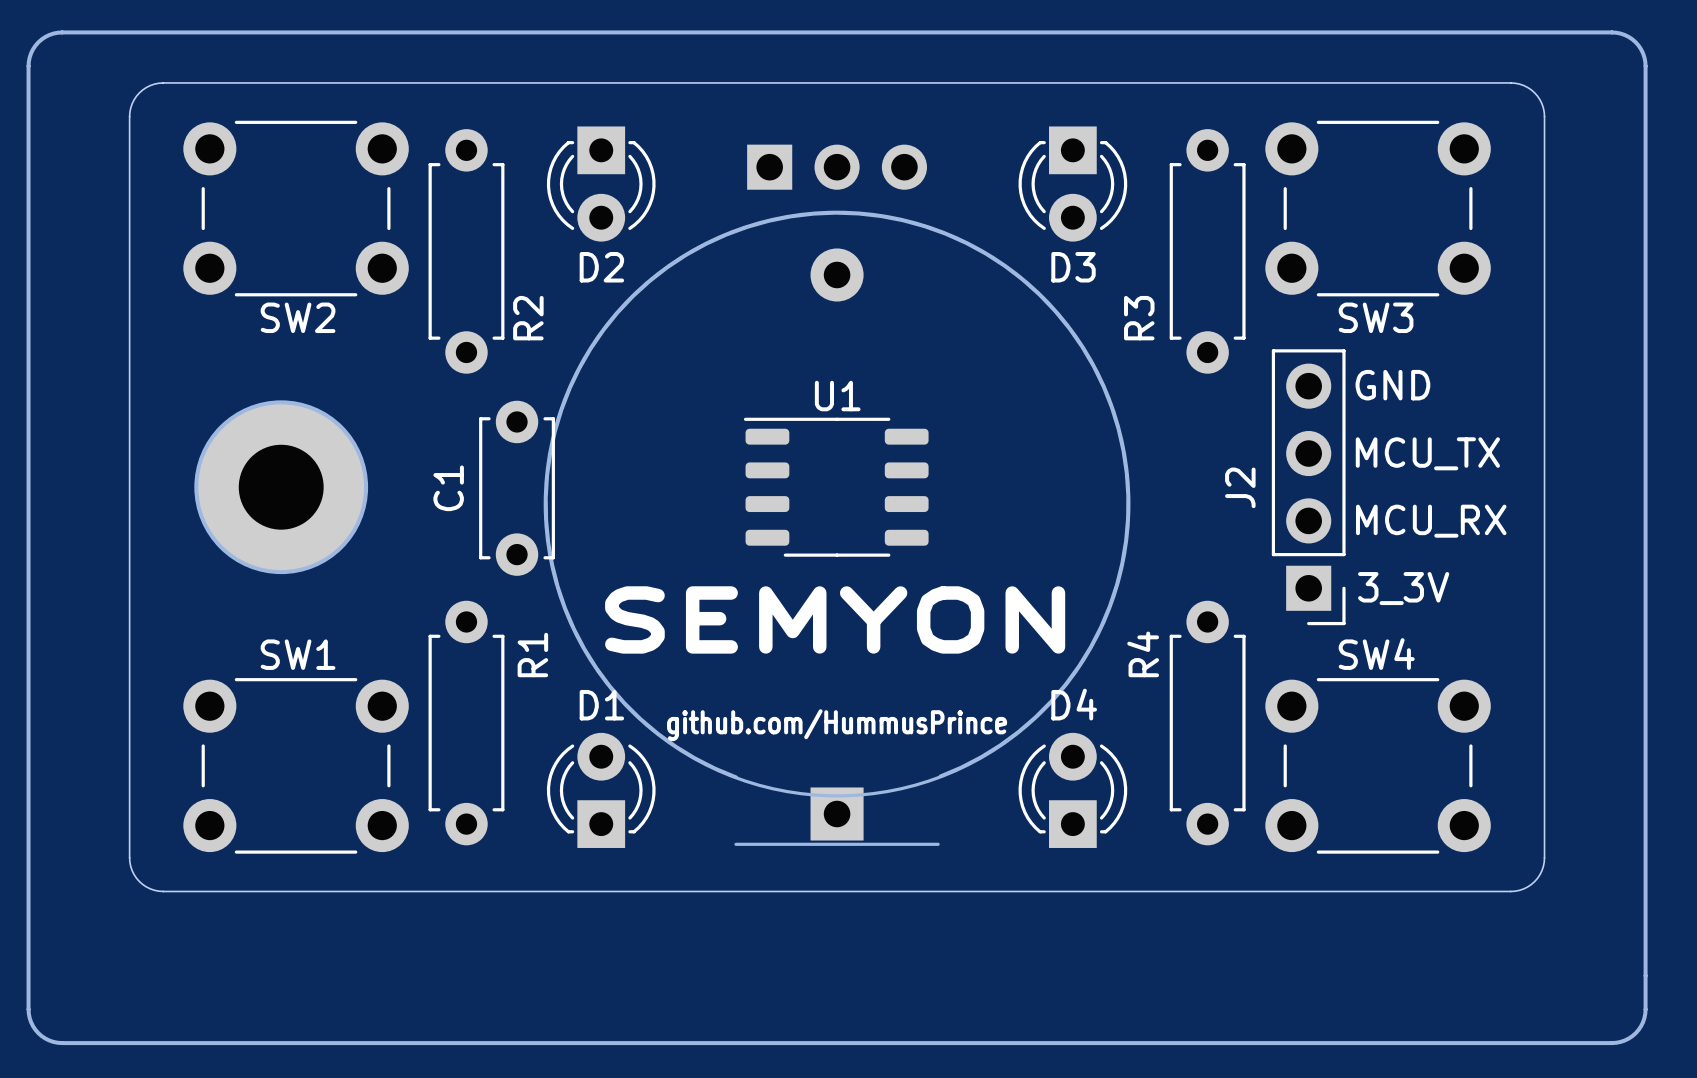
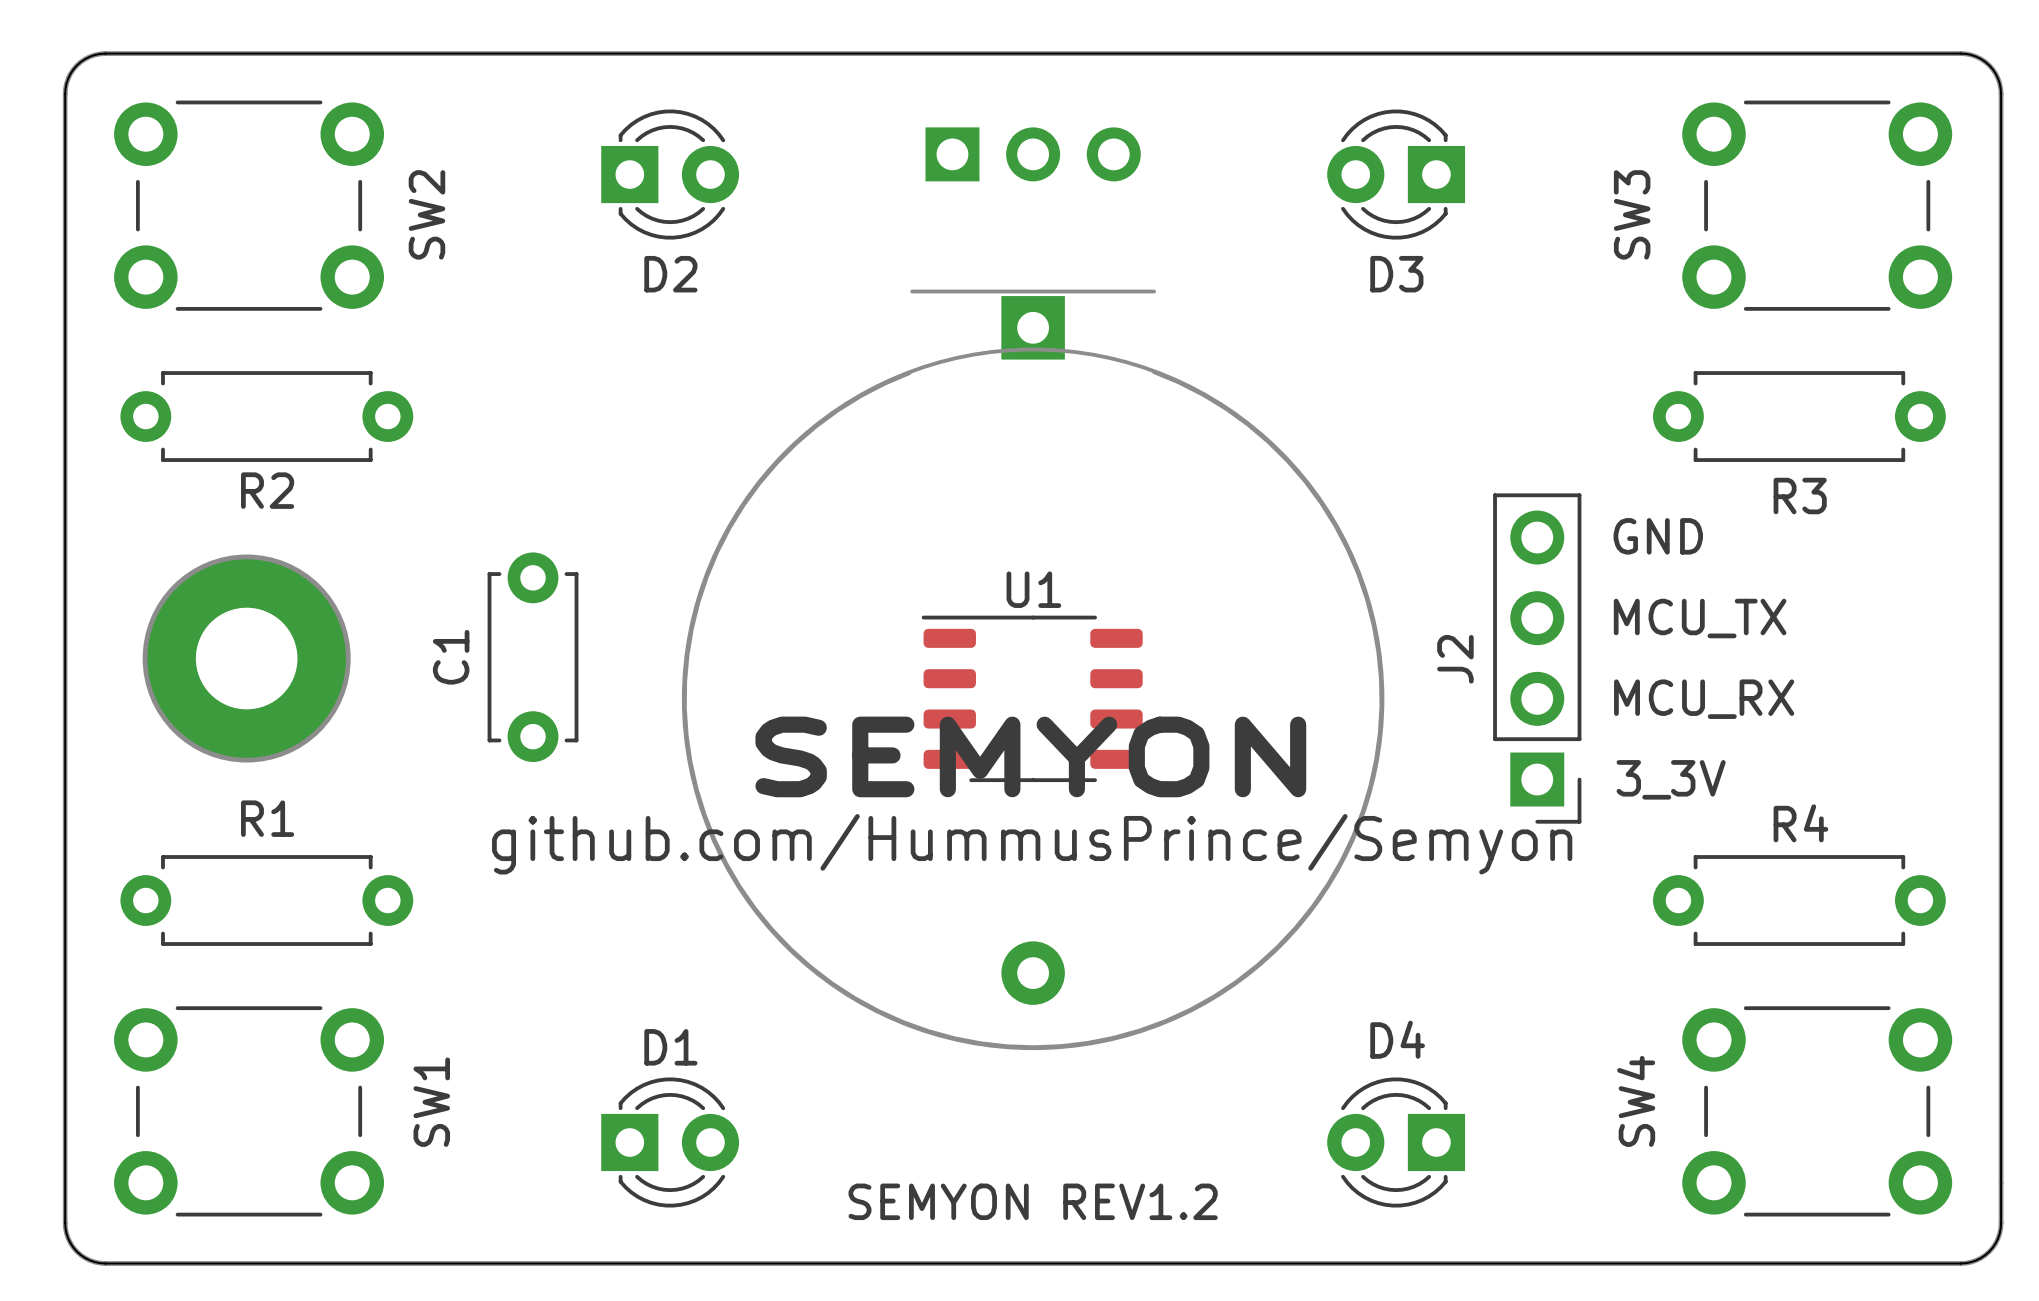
board edge: (163, 82) (1510, 82) (1527, 87) (1540, 99) (1544, 116) (1544, 857) (1540, 874) (1527, 886) (1510, 891) (163, 891) (146, 886) (134, 874) (129, 857) (129, 116) (132, 103) (139, 92) (150, 85) (163, 82) -> (105, 53) (90, 56) (76, 65) (68, 78) (65, 93) (65, 1223) (70, 1243) (85, 1258) (105, 1263) (1960, 1263) (1980, 1258) (1995, 1243) (2001, 1223) (2001, 93) (1995, 73) (1980, 58) (1960, 53) (105, 53)
part position: (837, 167) -> (1033, 154)
D2 rotation: 0° (601, 184) -> 90° counterclockwise (670, 174)
D2 position: (601, 184) -> (670, 174)
D3 rotation: 0° (1072, 184) -> 90° clockwise (1396, 174)
D3 position: (1072, 184) -> (1396, 174)
SW2 position: (296, 208) -> (249, 205)
SW3 position: (1378, 208) -> (1817, 205)
R2 rotation: 0° (466, 251) -> 90° clockwise (266, 416)
R2 position: (466, 251) -> (266, 416)
R3 rotation: 0° (1207, 251) -> 90° clockwise (1799, 416)
R3 position: (1207, 251) -> (1799, 416)
SW2 name rotation: 0° (298, 317) -> 90° counterclockwise (426, 214)
SW2 name position: SW2 (298, 317) -> SW2 (426, 214)
SW3 name rotation: 0° (1376, 317) -> 90° counterclockwise (1632, 214)
SW3 name position: SW3 (1376, 317) -> SW3 (1632, 214)
R2 name position: R2 (528, 318) -> R2 (267, 490)
R3 name position: R3 (1139, 318) -> R3 (1800, 496)
text position: GND (1392, 385) -> GND (1658, 536)
text position: MCU_TX (1427, 453) -> MCU_TX (1700, 618)
part position: (281, 487) -> (246, 658)
U1 position: (836, 487) -> (1032, 698)
J2 position: (1308, 487) -> (1537, 658)
C1 position: (517, 488) -> (533, 657)
text position: MCU_RX (1431, 521) -> MCU_RX (1704, 699)
part rotation: 0° (837, 528) -> 180° (1033, 669)
text position: 3_3V (1403, 588) -> 3_3V (1671, 779)
SW1 name rotation: 0° (298, 654) -> 90° counterclockwise (431, 1102)
SW1 name position: SW1 (298, 654) -> SW1 (431, 1102)
R4 name position: R4 (1143, 654) -> R4 (1800, 823)
SW4 name rotation: 0° (1376, 654) -> 90° counterclockwise (1636, 1101)
SW4 name position: SW4 (1376, 654) -> SW4 (1636, 1101)
R1 name position: R1 (532, 655) -> R1 (267, 818)
R1 rotation: 0° (466, 723) -> 90° clockwise (266, 900)
R1 position: (466, 723) -> (266, 900)
R4 rotation: 0° (1207, 723) -> 90° clockwise (1799, 900)
R4 position: (1207, 723) -> (1799, 900)
text: github.com/HummusPrince (837, 725) -> github.com/HummusPrince/Semyon (1032, 844)
SW1 position: (296, 765) -> (249, 1111)
SW4 position: (1378, 765) -> (1817, 1111)
D1 rotation: 0° (601, 790) -> 90° clockwise (670, 1142)
D1 position: (601, 790) -> (670, 1142)
D4 rotation: 0° (1072, 790) -> 90° counterclockwise (1396, 1142)
D4 position: (1072, 790) -> (1396, 1142)
text: none -> SEMYON REV1.2 (1033, 1201)

